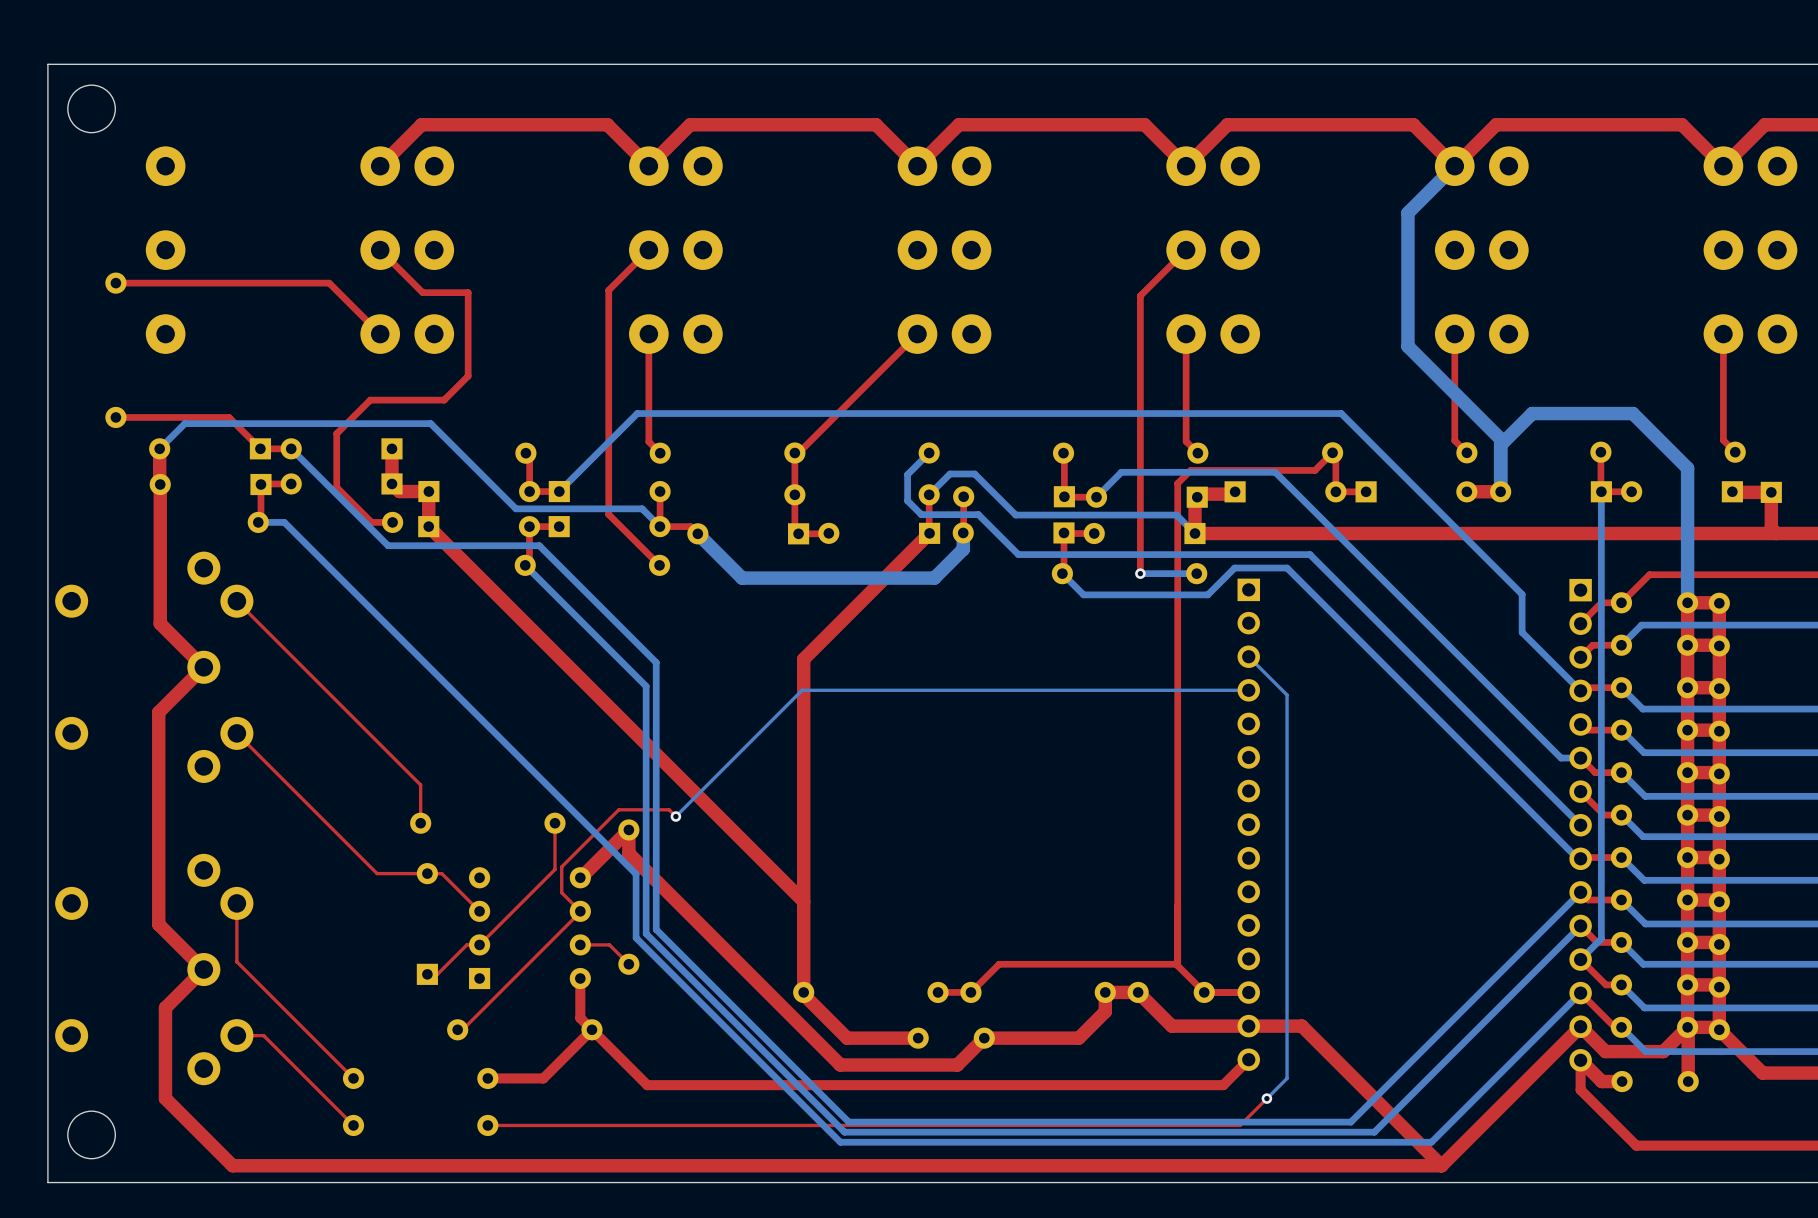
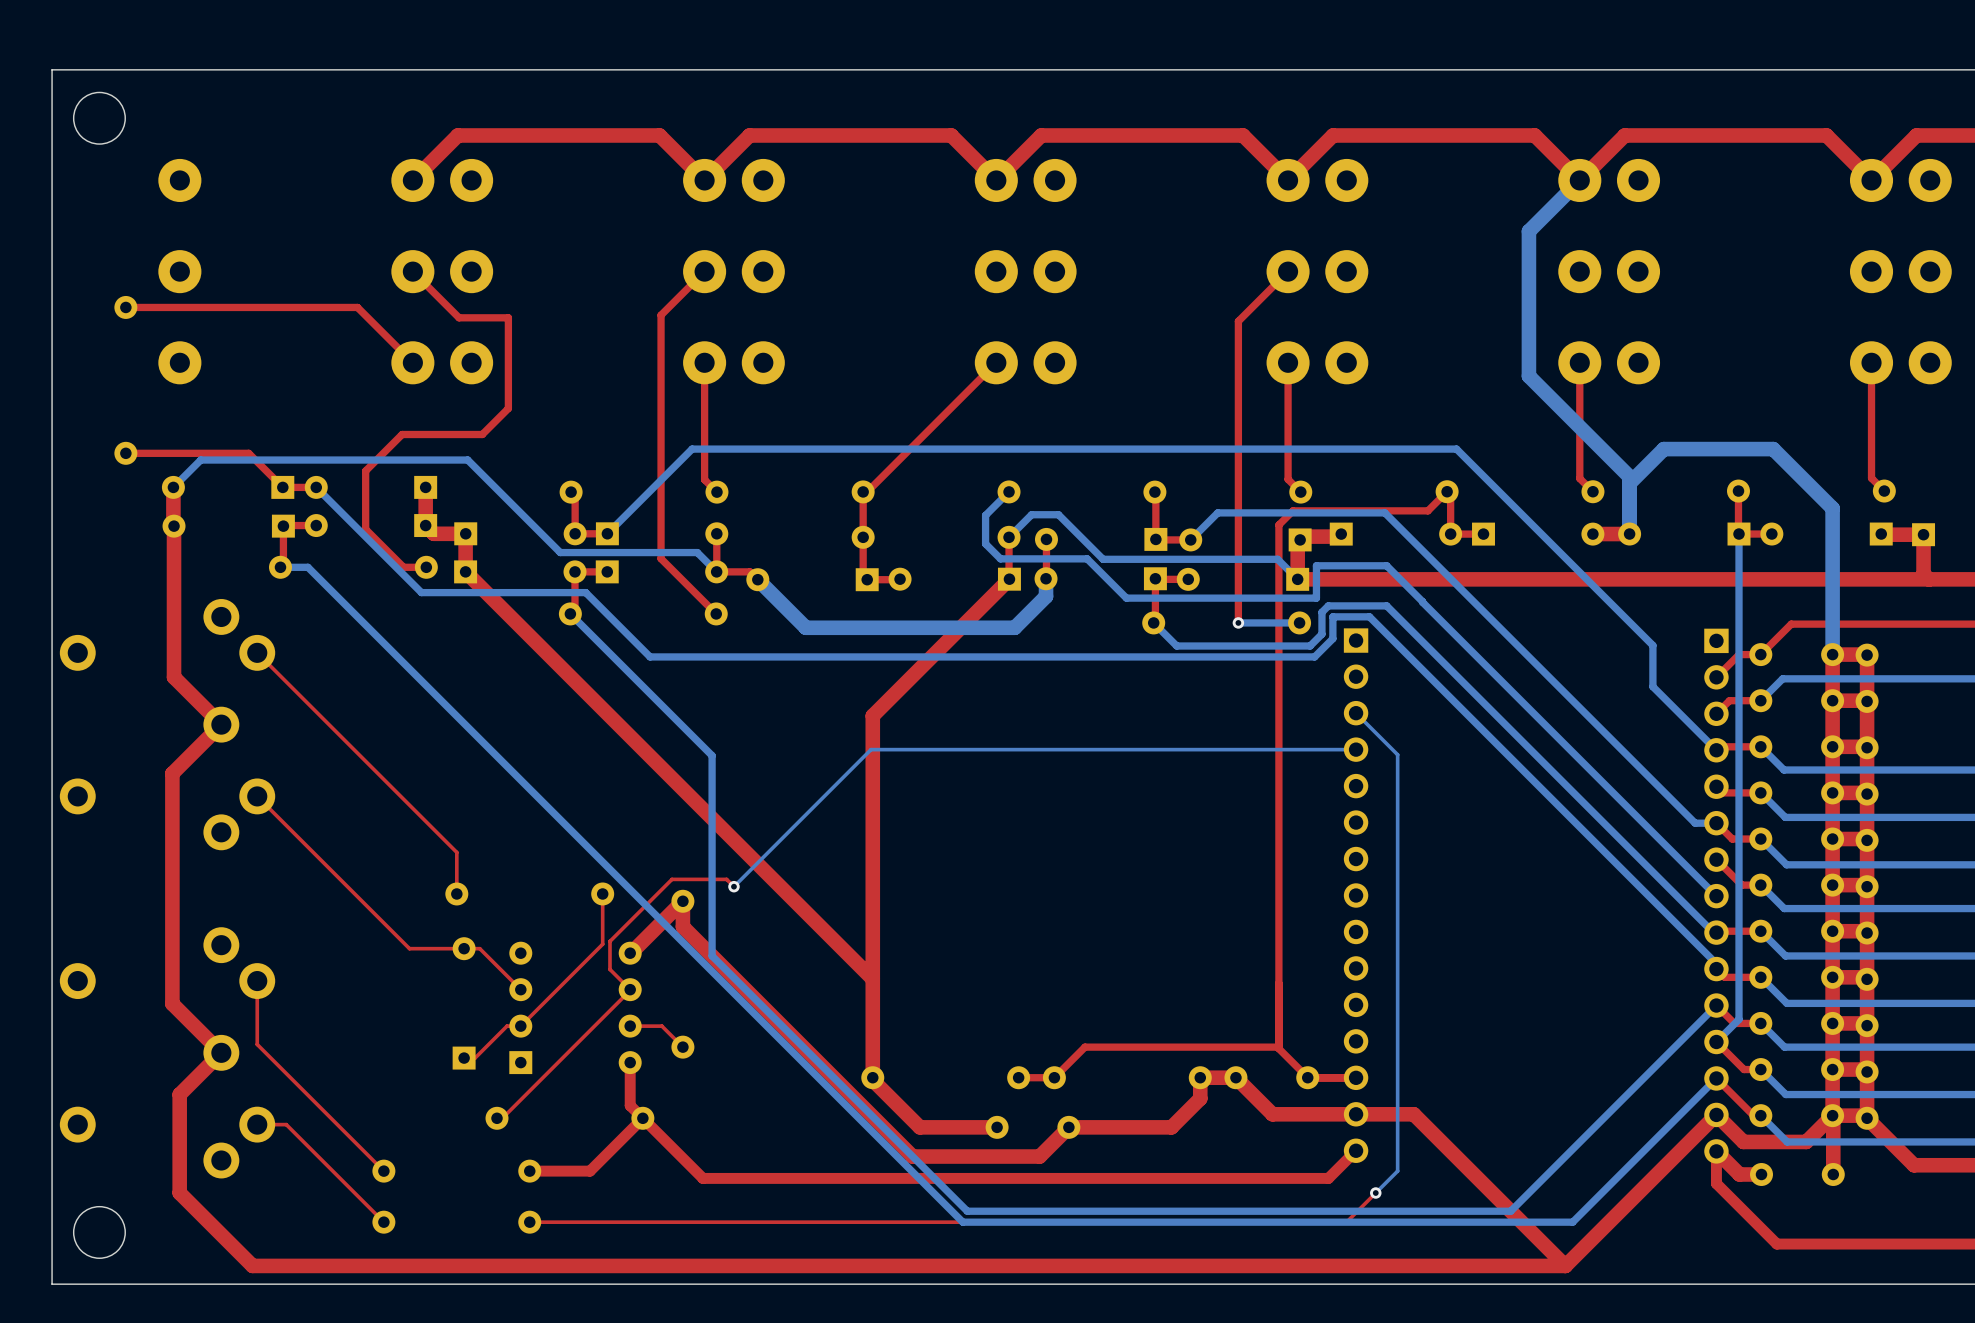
bottom track: (978, 514) (1018, 554) (1309, 554) -> (1062, 558) (1087, 558) (1126, 598) (1316, 598) (1316, 565) (1386, 565) (1422, 602)
bottom track: (283, 522) (636, 874) (636, 937) (840, 1142) (1431, 1142) (1448, 1125) -> (307, 567) (962, 1222) (1572, 1222)
bottom track: (1234, 568) (1206, 594) -> (1397, 616) (1386, 605) (1328, 605) (1321, 612) (1321, 634) (1310, 646)
bottom track: (1287, 568) (1261, 568) -> (1716, 969) (1716, 963) (1369, 616)
bottom track: (598, 604) (656, 662) (656, 929) (848, 1122) (1350, 1122) (1580, 892) -> (650, 656) (1314, 656) (1332, 638) (1332, 616) (1340, 616)
bottom track: (646, 686) (646, 933) (844, 1132) (1374, 1132) (1391, 1115) -> (701, 745) (712, 755) (712, 955) (967, 1211) (1510, 1211)

